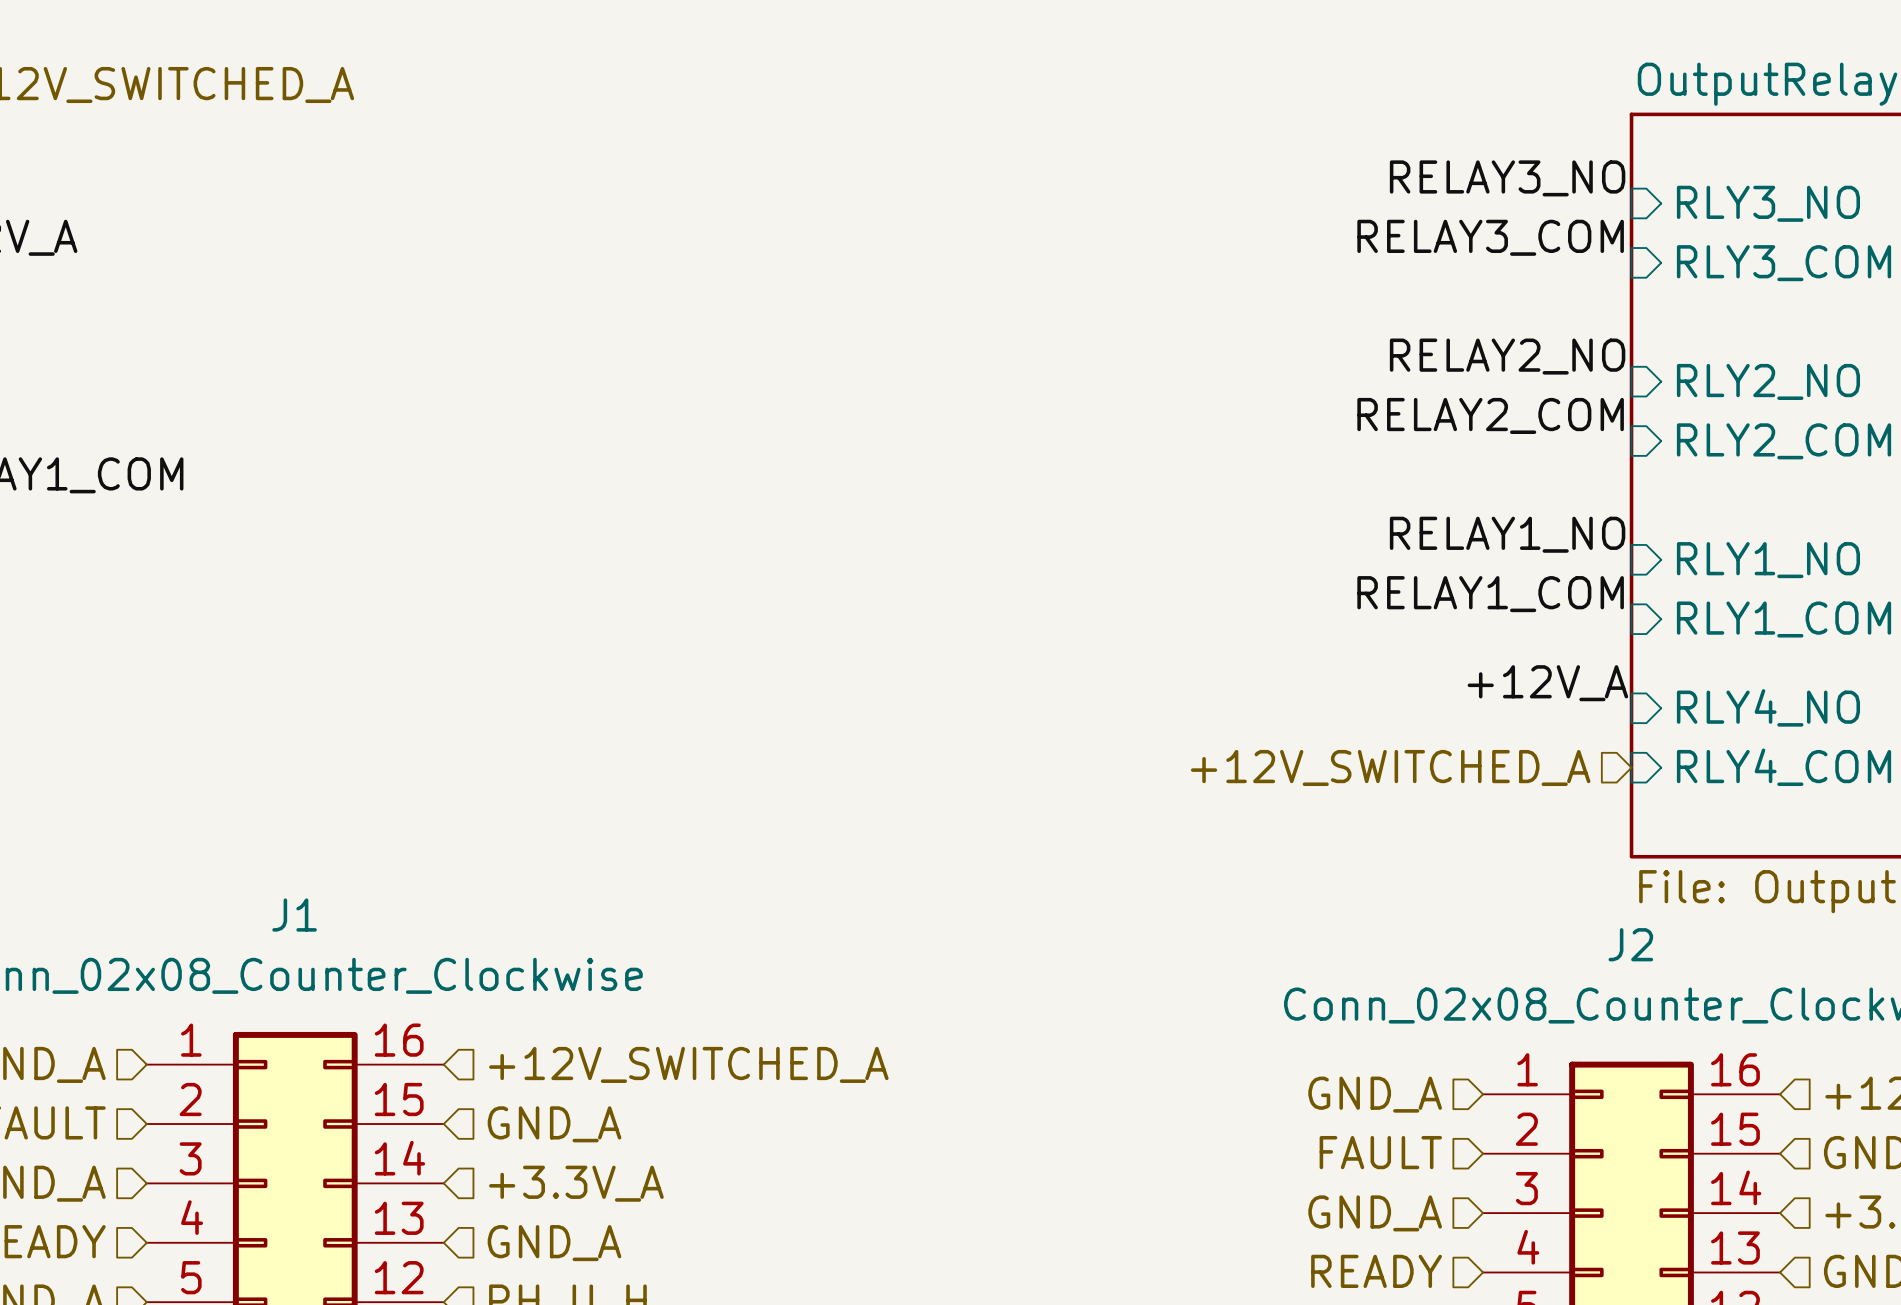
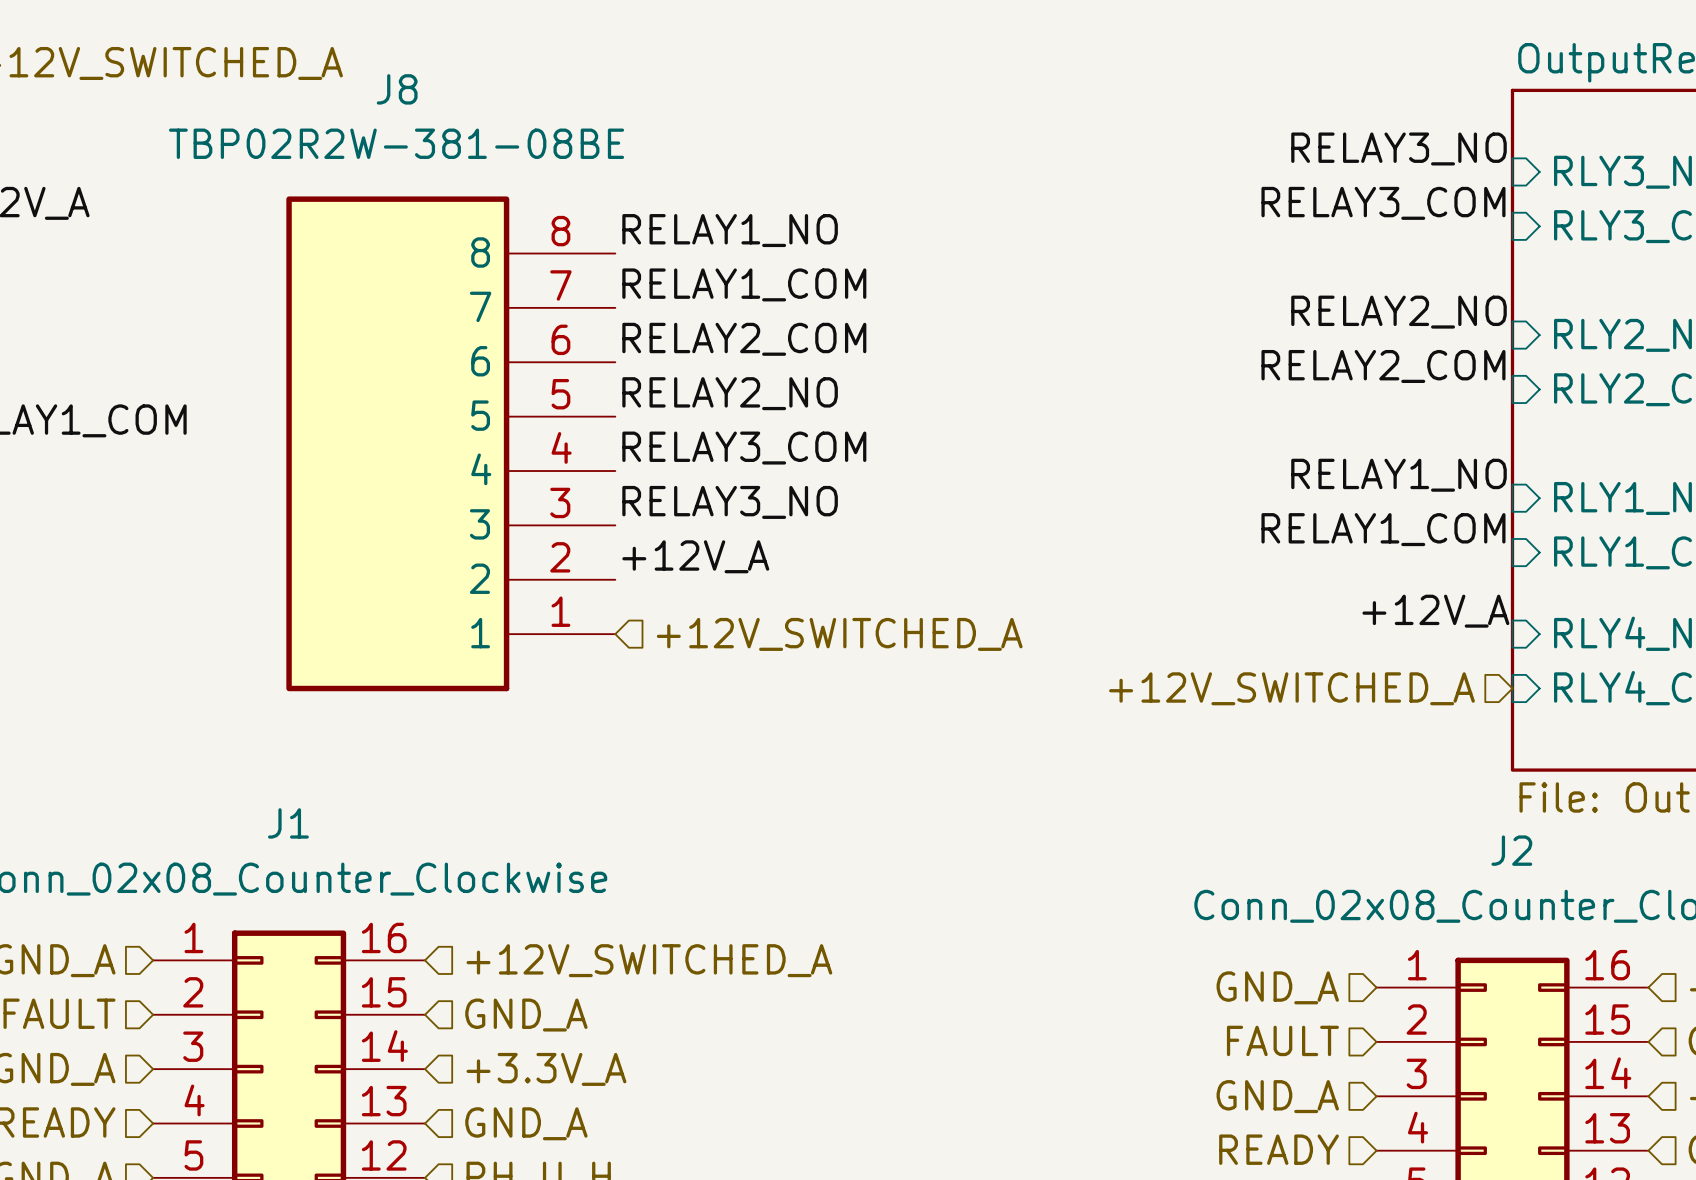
label: none -> RELAY1_NO (730, 230)
label: none -> RELAY1_COM (744, 284)
label: none -> RELAY2_COM (744, 339)
label: none -> RELAY2_NO (730, 393)
J8: none -> TBP02R2W-381-08BE (450, 443)
label: none -> RELAY3_COM (744, 448)
label: none -> RELAY3_NO (730, 502)
label: none -> +12V_A (695, 556)
hierarchical label: none -> +12V_SWITCHED_A (839, 634)

